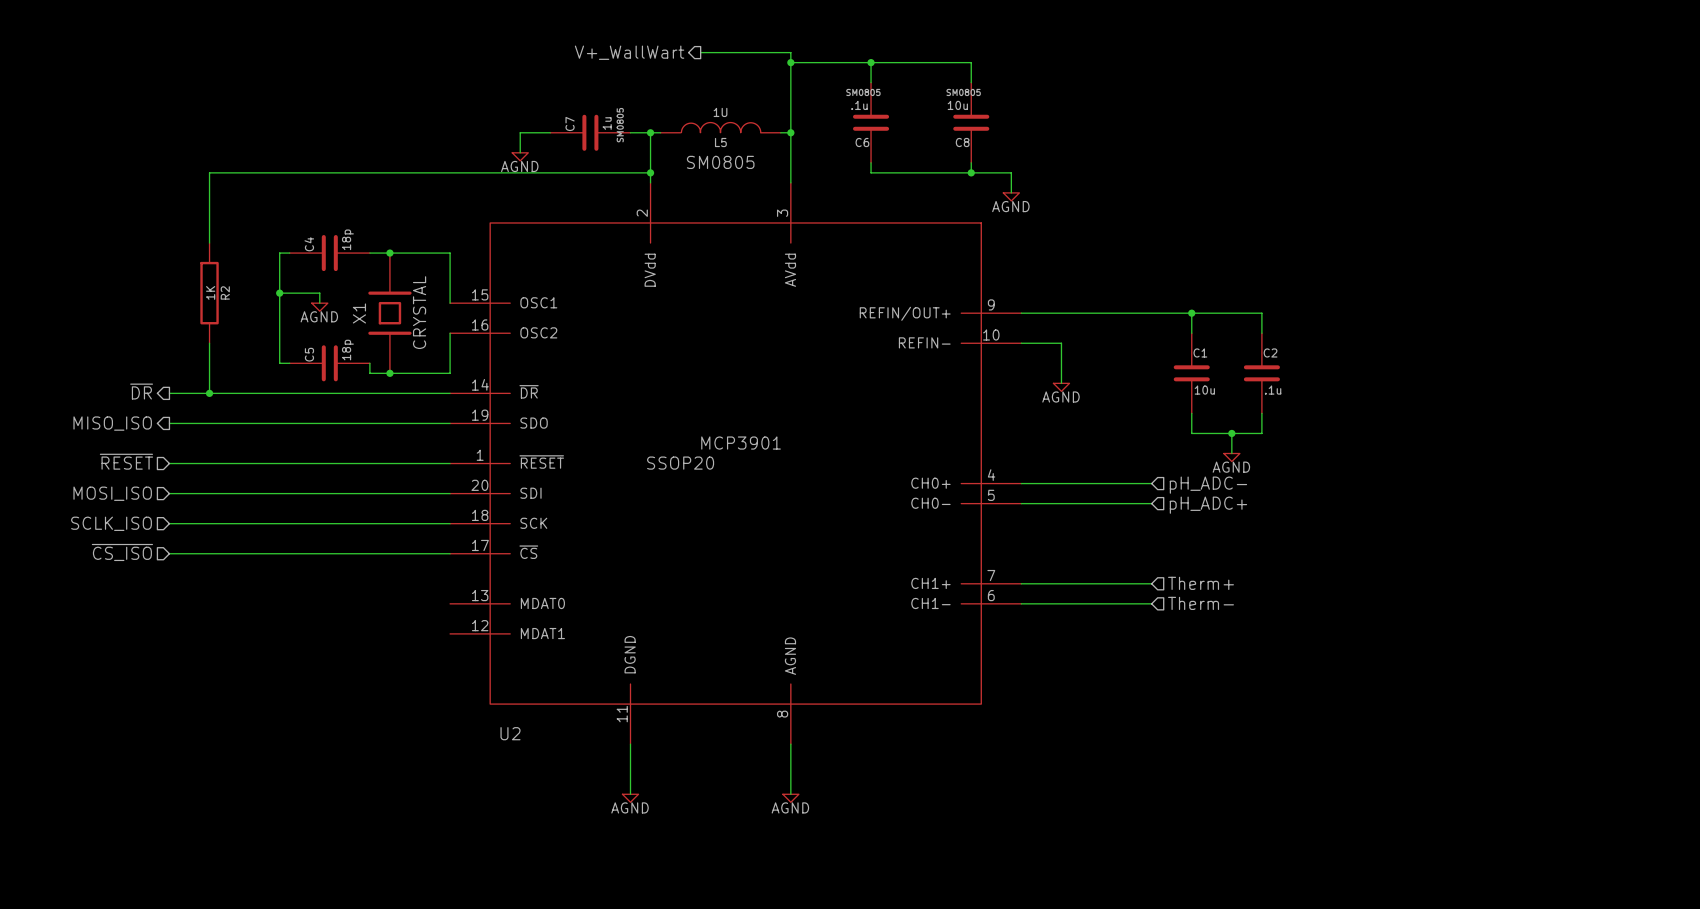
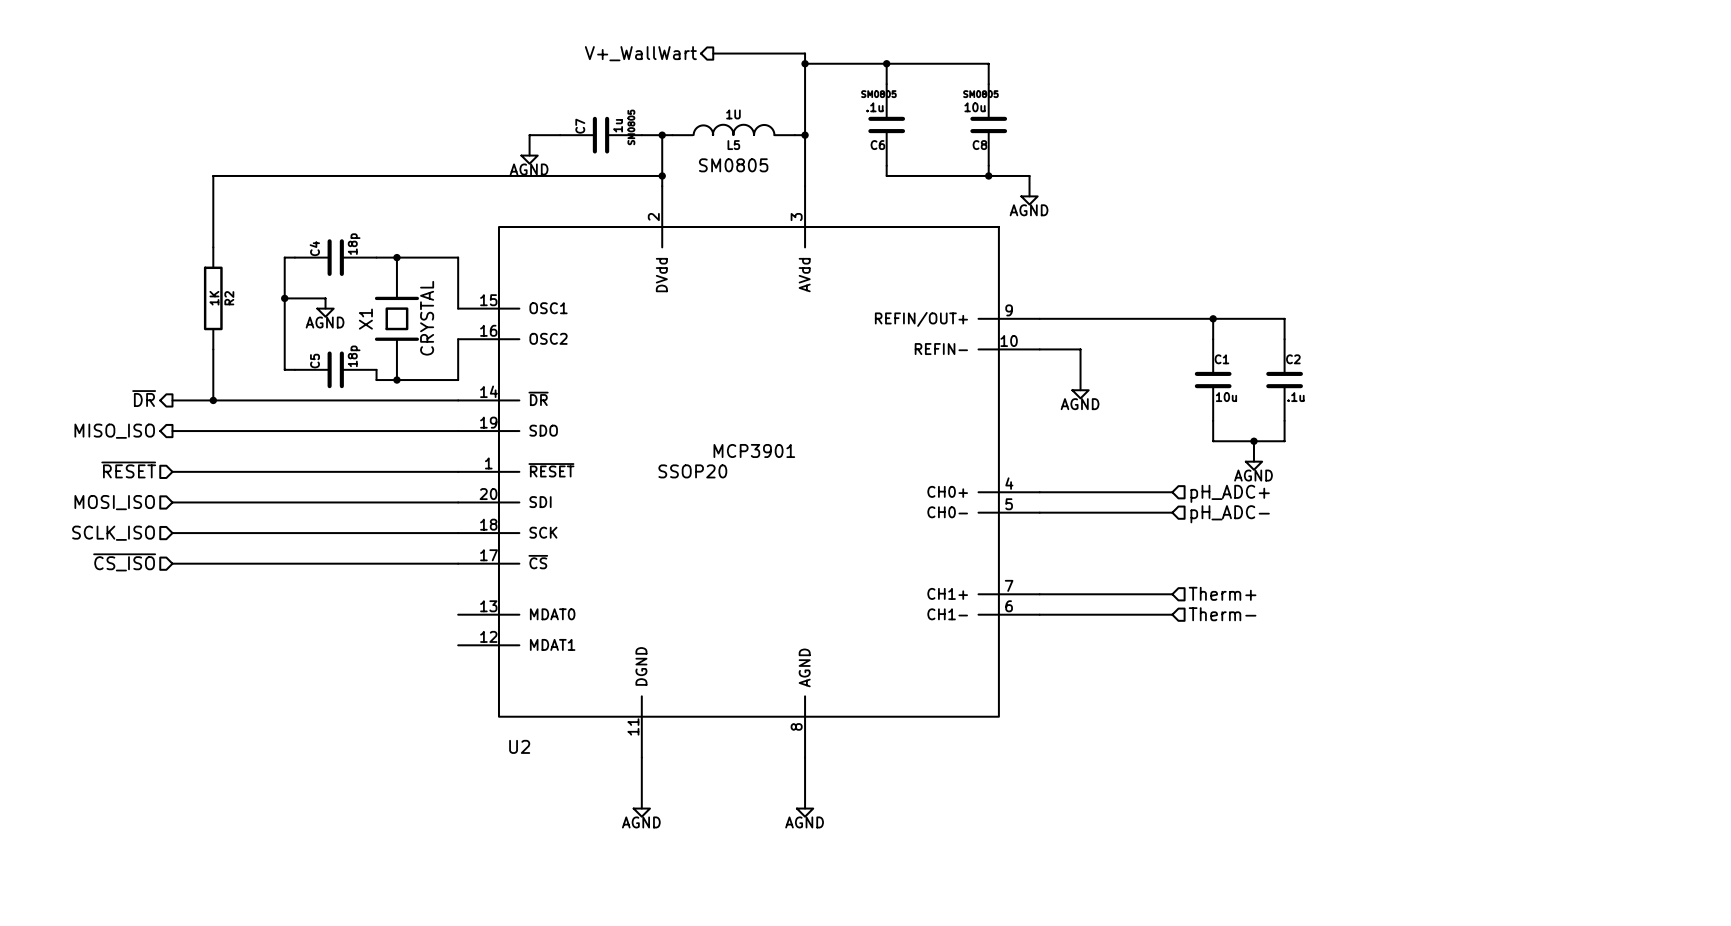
hierarchical label: pH_ADC- (1208, 485) -> pH_ADC+ (1230, 493)
hierarchical label: pH_ADC+ (1208, 505) -> pH_ADC- (1230, 514)

